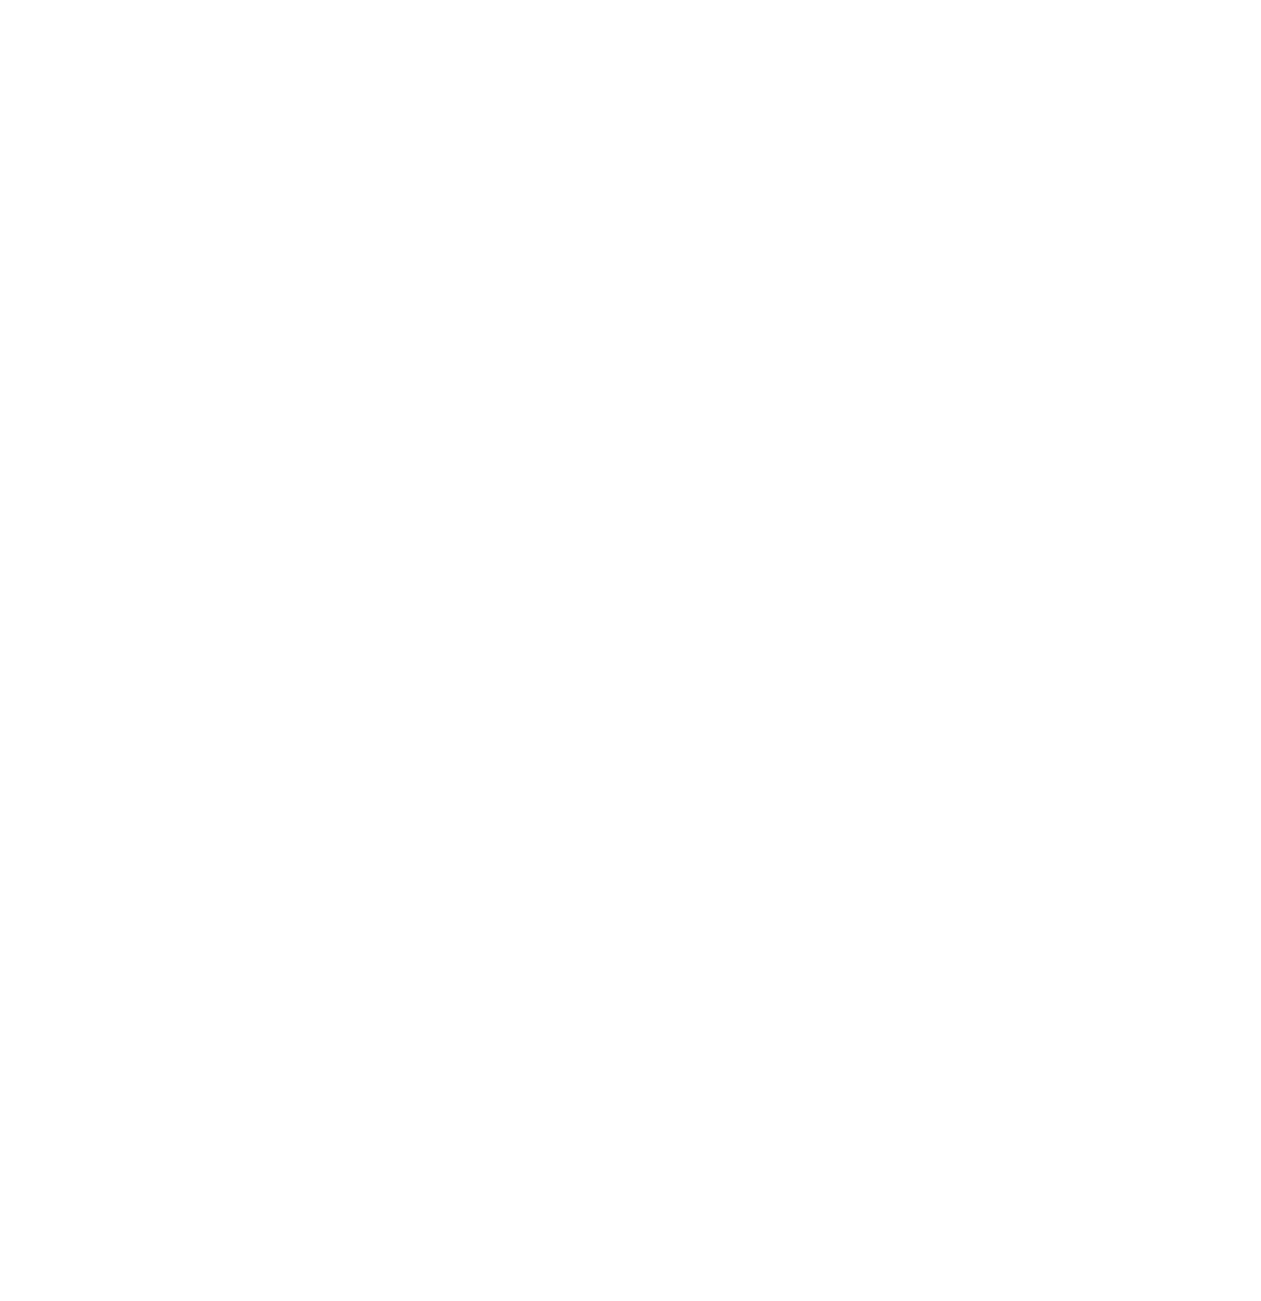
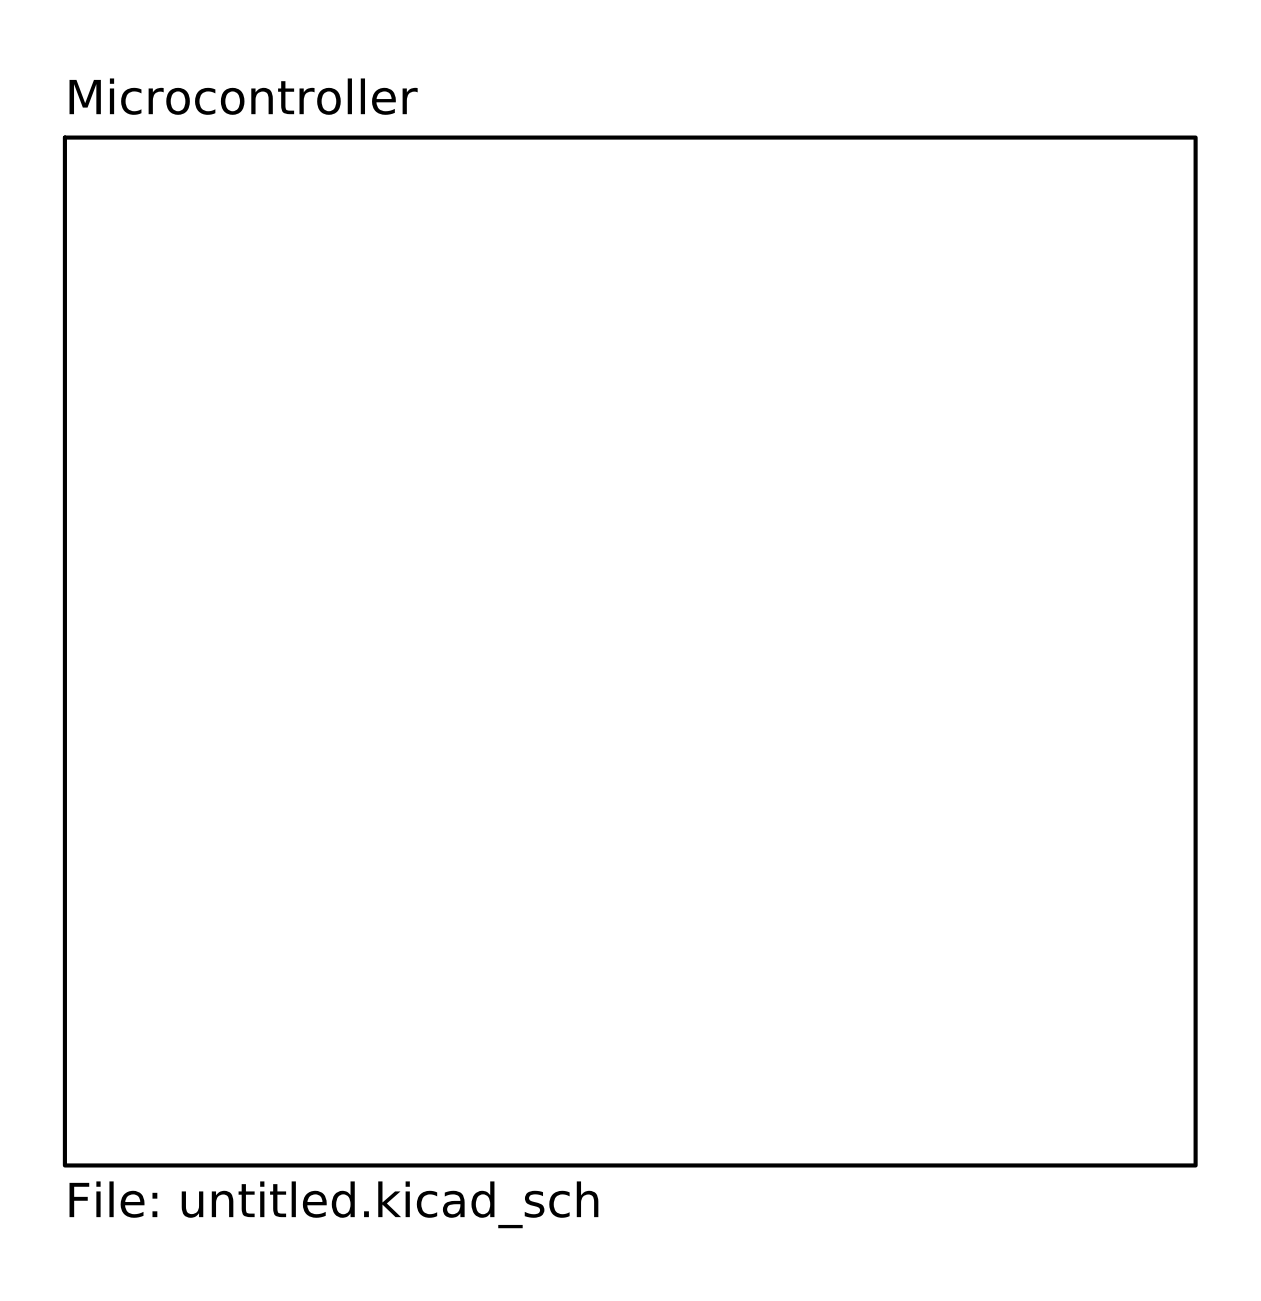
sheet Microcontroller: none -> File: untitled.kicad_sch (630, 651)

